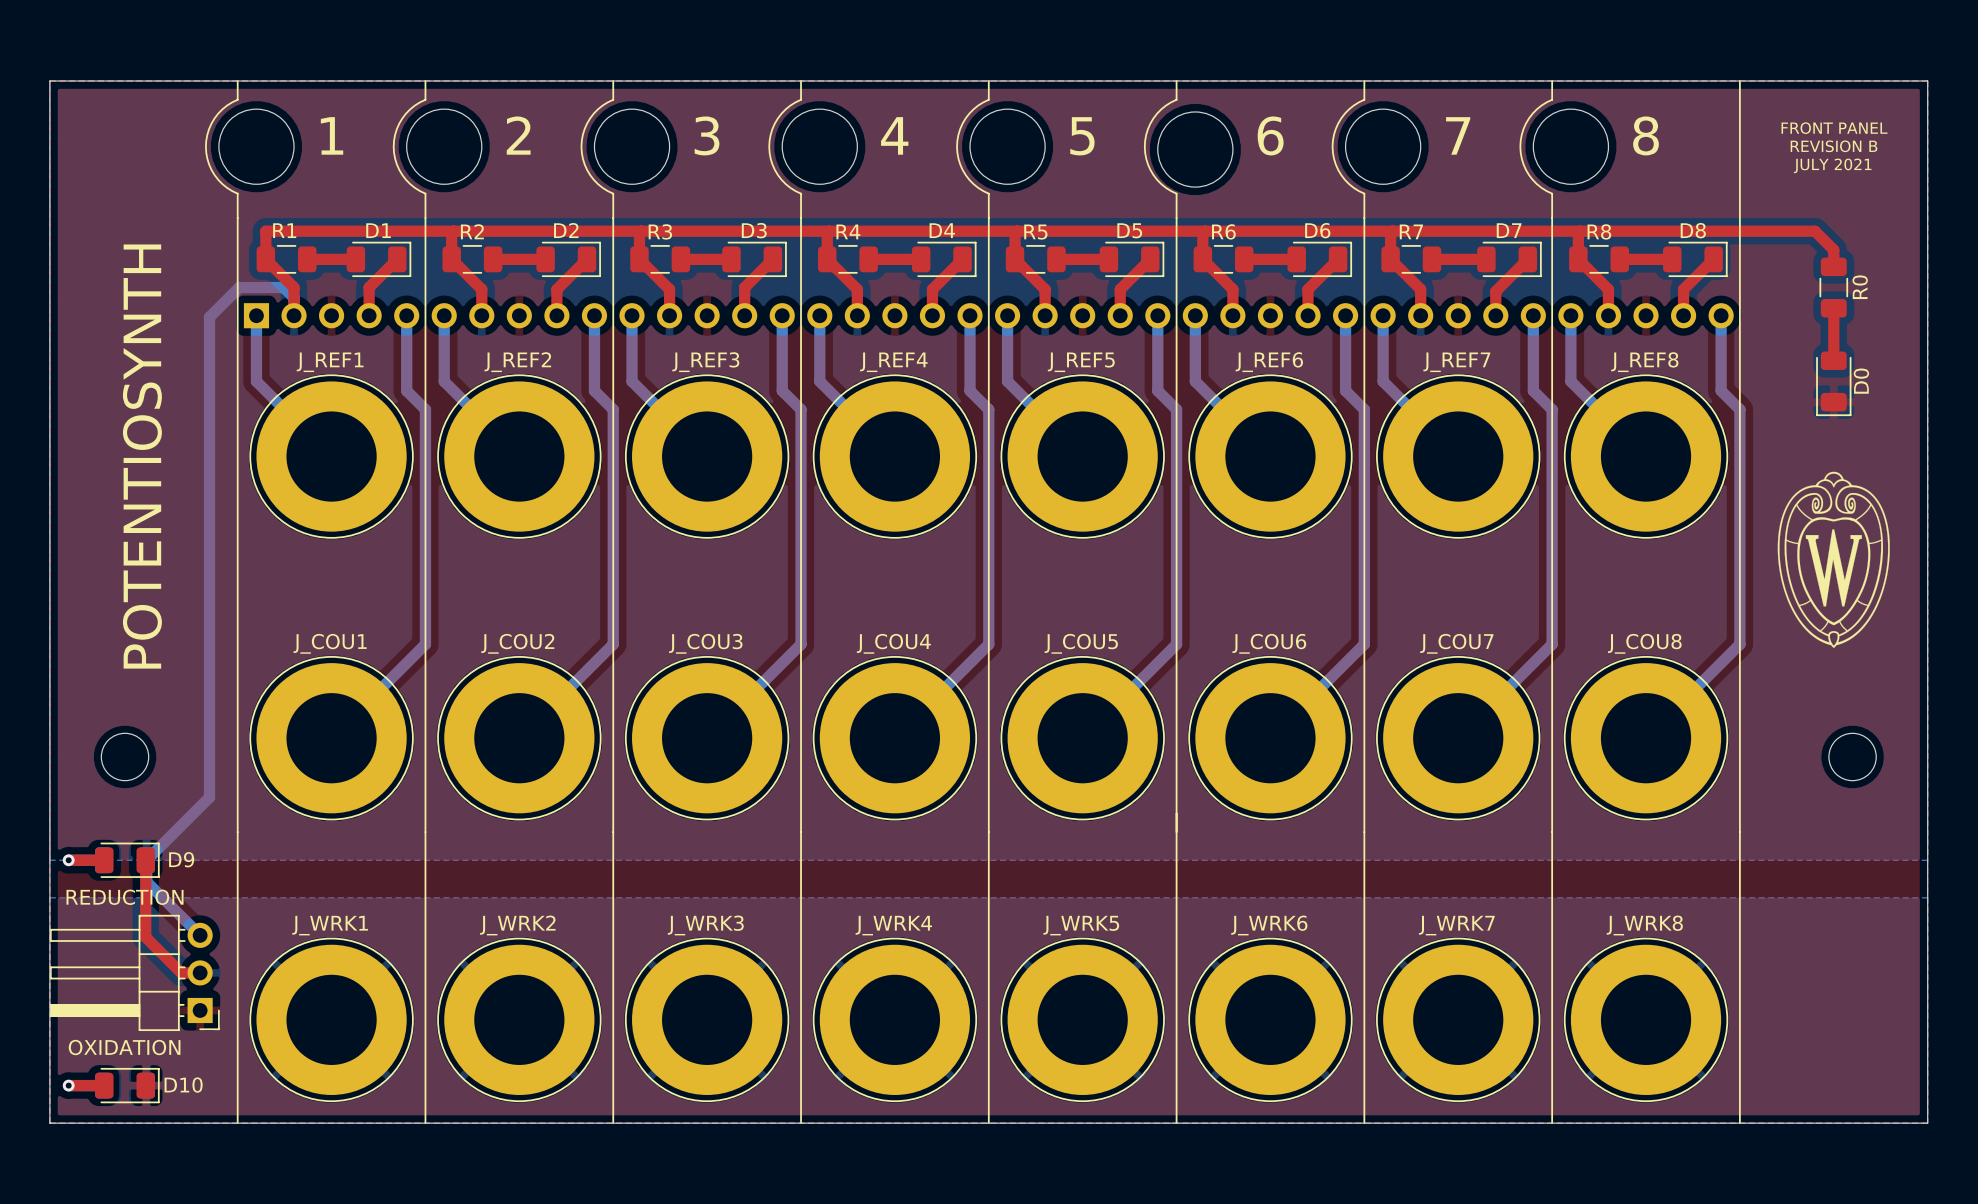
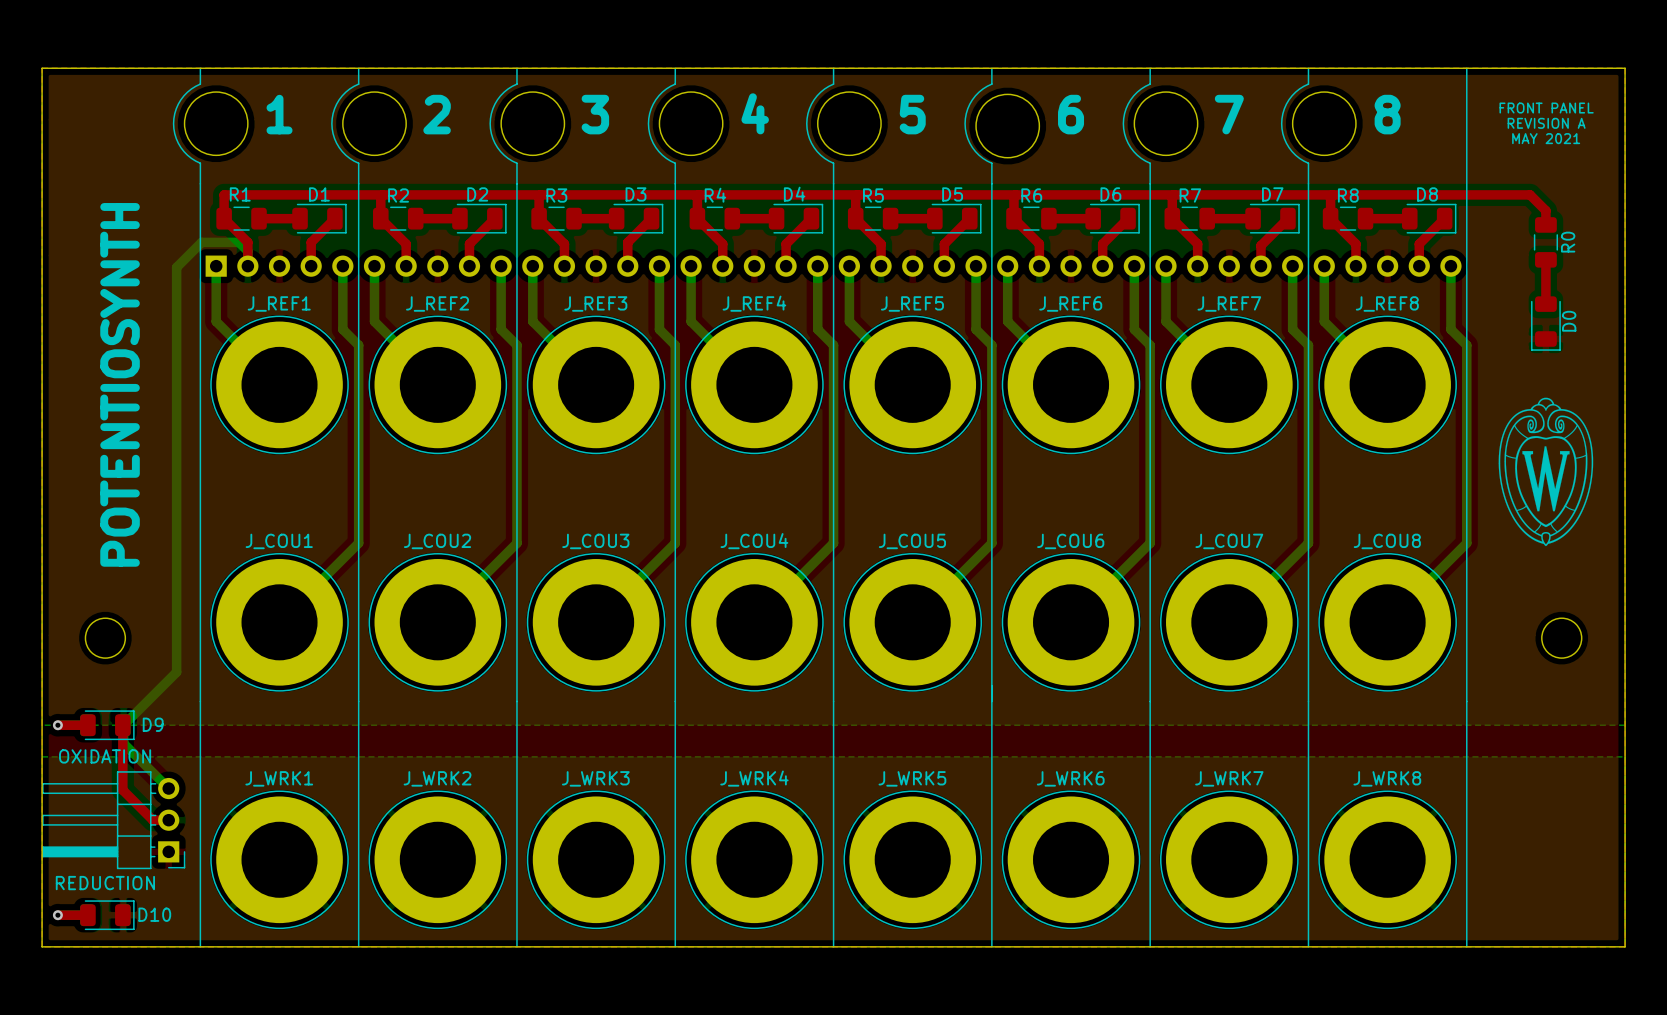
text: REVISION B (1834, 146) -> REVISION A (1546, 123)
text: JULY 2021 (1832, 165) -> MAY 2021 (1546, 138)
text: REDUCTION (125, 897) -> OXIDATION (105, 756)
text: OXIDATION (124, 1047) -> REDUCTION (105, 883)

